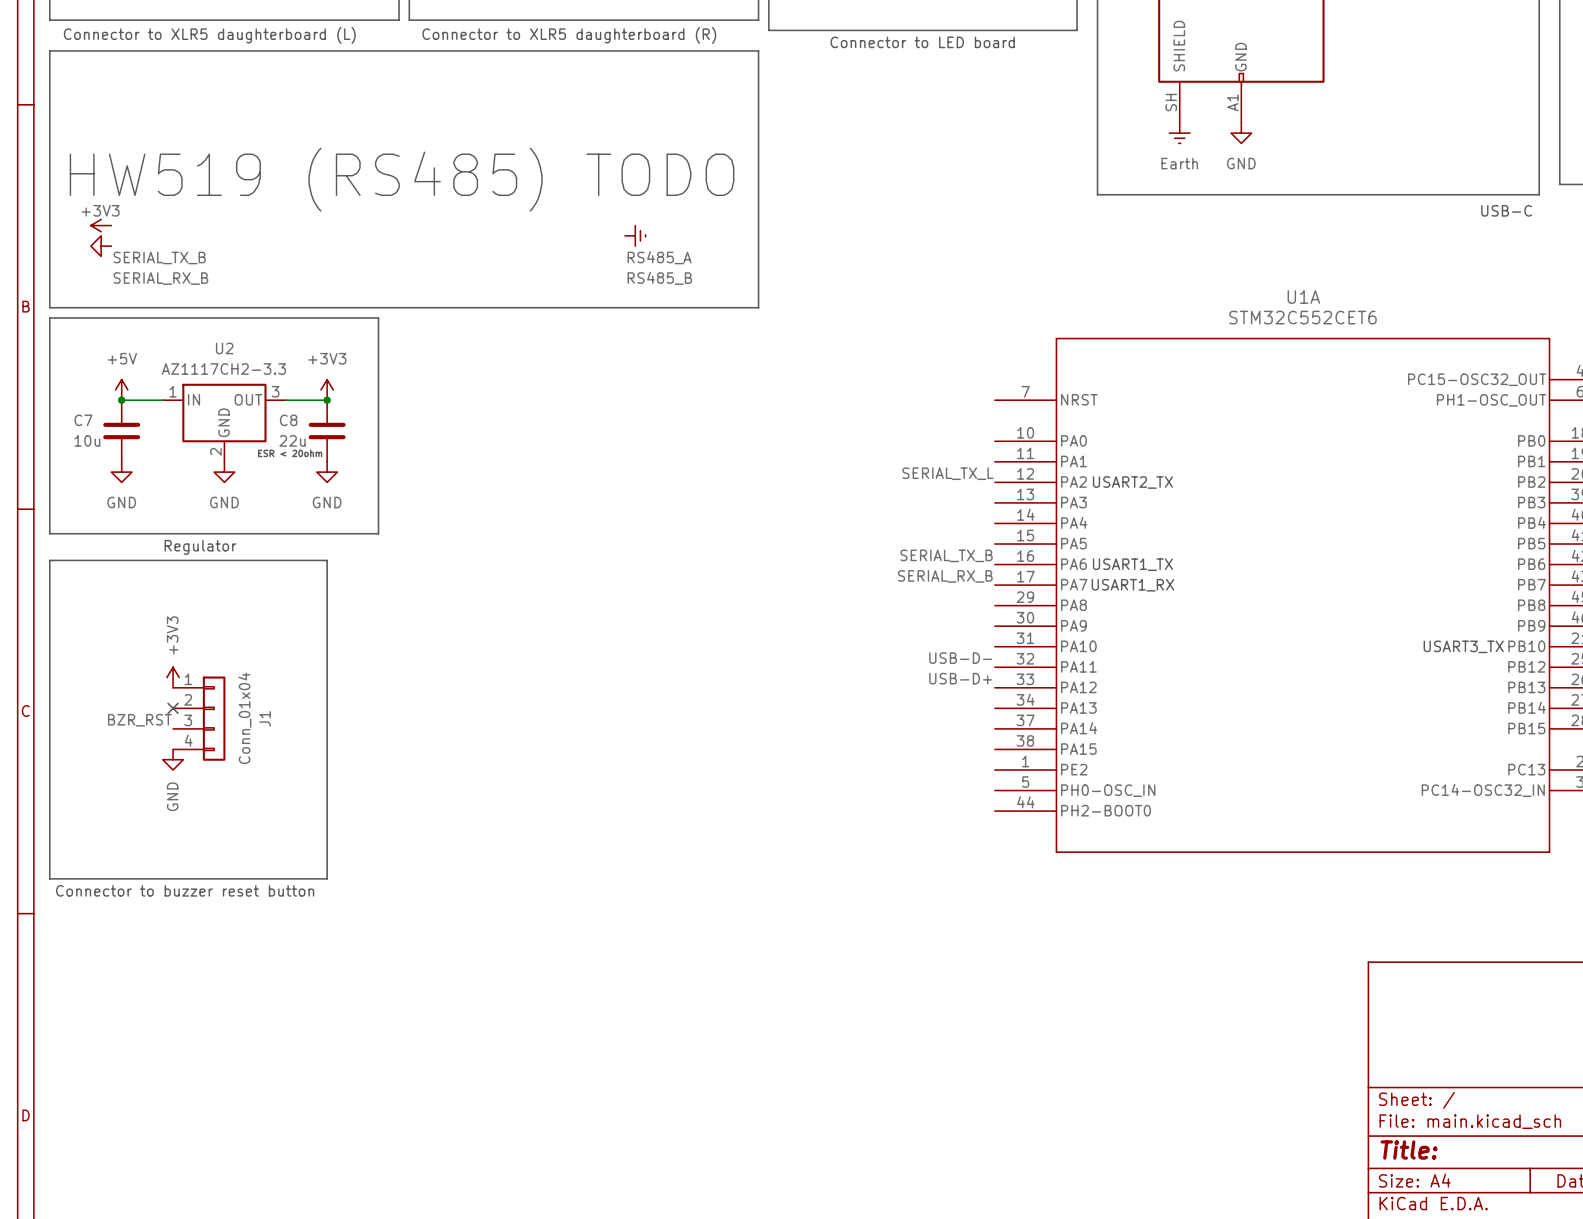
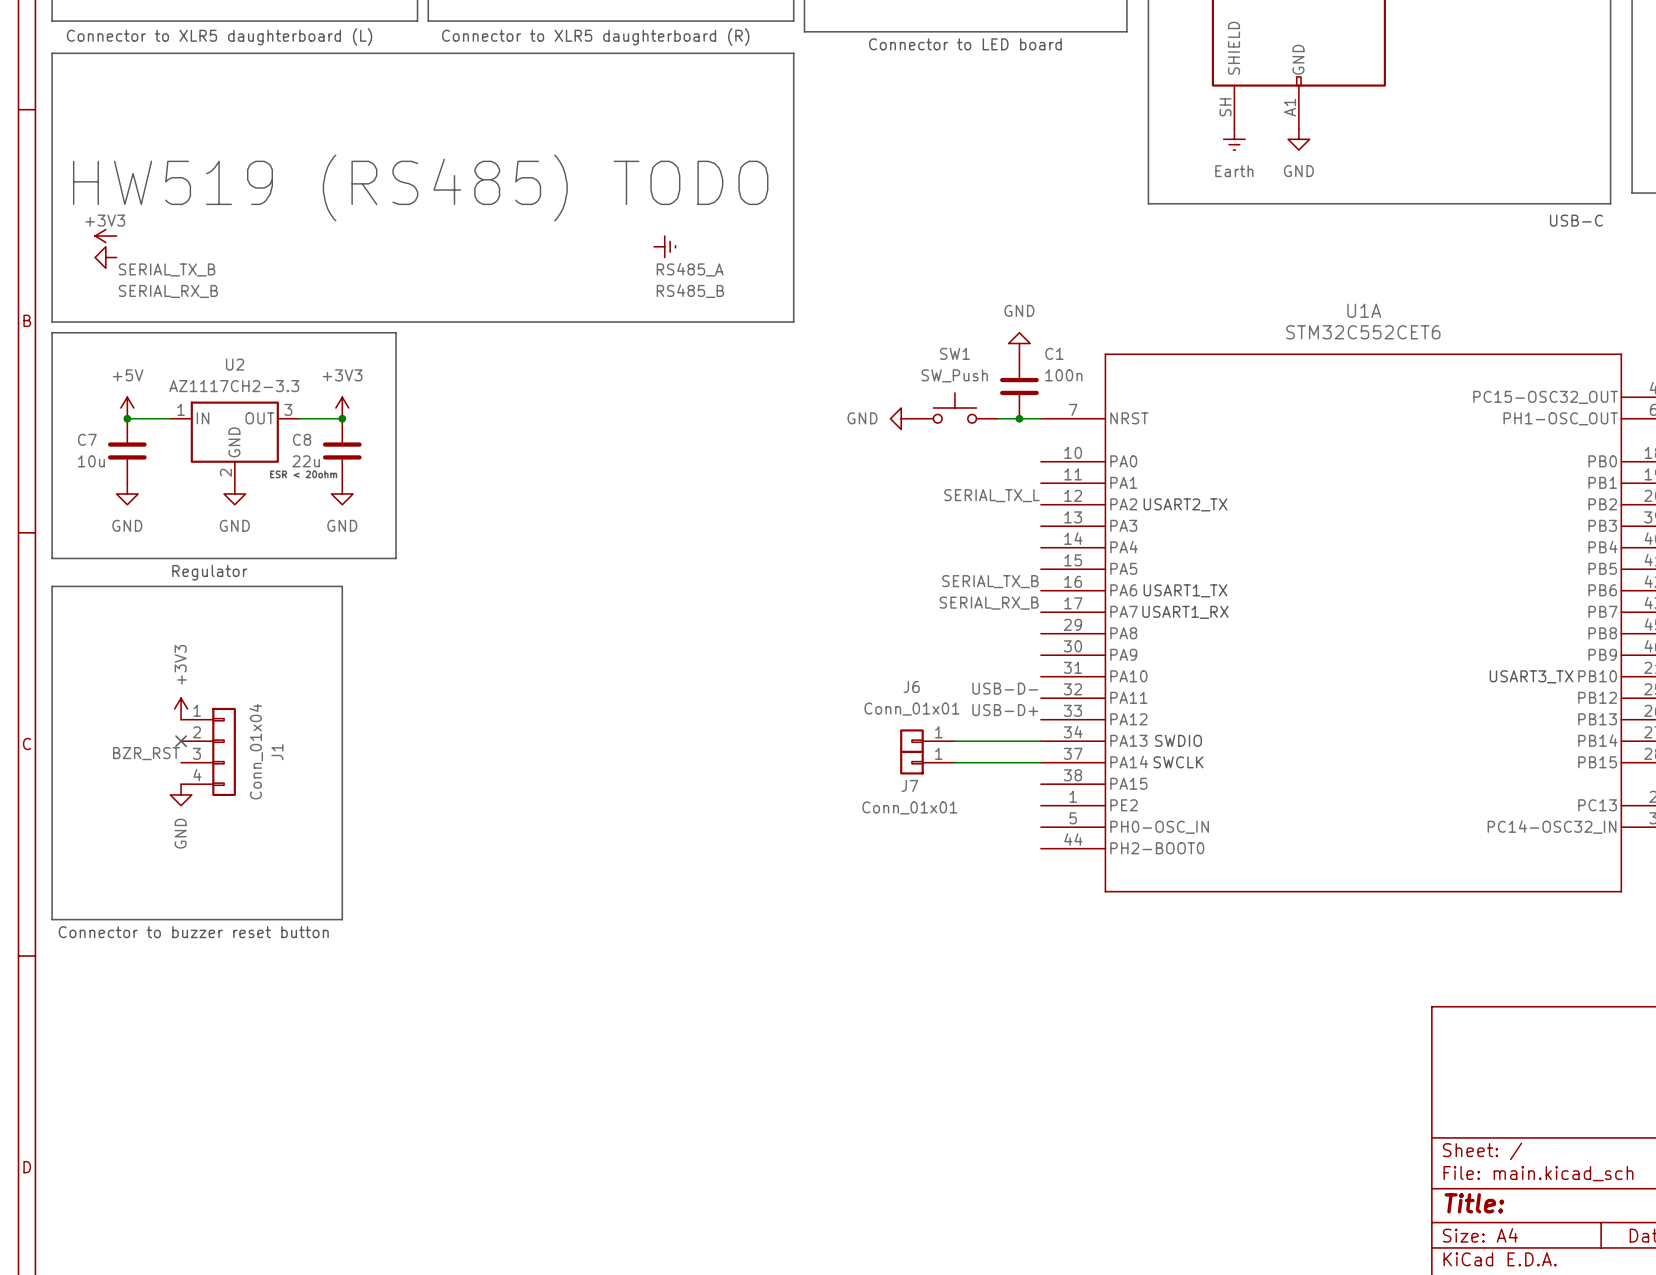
power symbol: none -> GND (1019, 343)
C1: none -> 100n (1019, 386)
SW1: none -> SW_Push (954, 408)
power symbol: none -> GND (901, 418)
wire: none -> (997, 418) (1040, 418)
junction: none -> (1019, 418)
J6: none -> Conn_01x01 (927, 741)
wire: none -> (954, 741) (1040, 741)
text: none -> SWDIO (1178, 740)
J7: none -> Conn_01x01 (927, 762)
wire: none -> (954, 762) (1040, 762)
text: none -> SWCLK (1178, 762)

